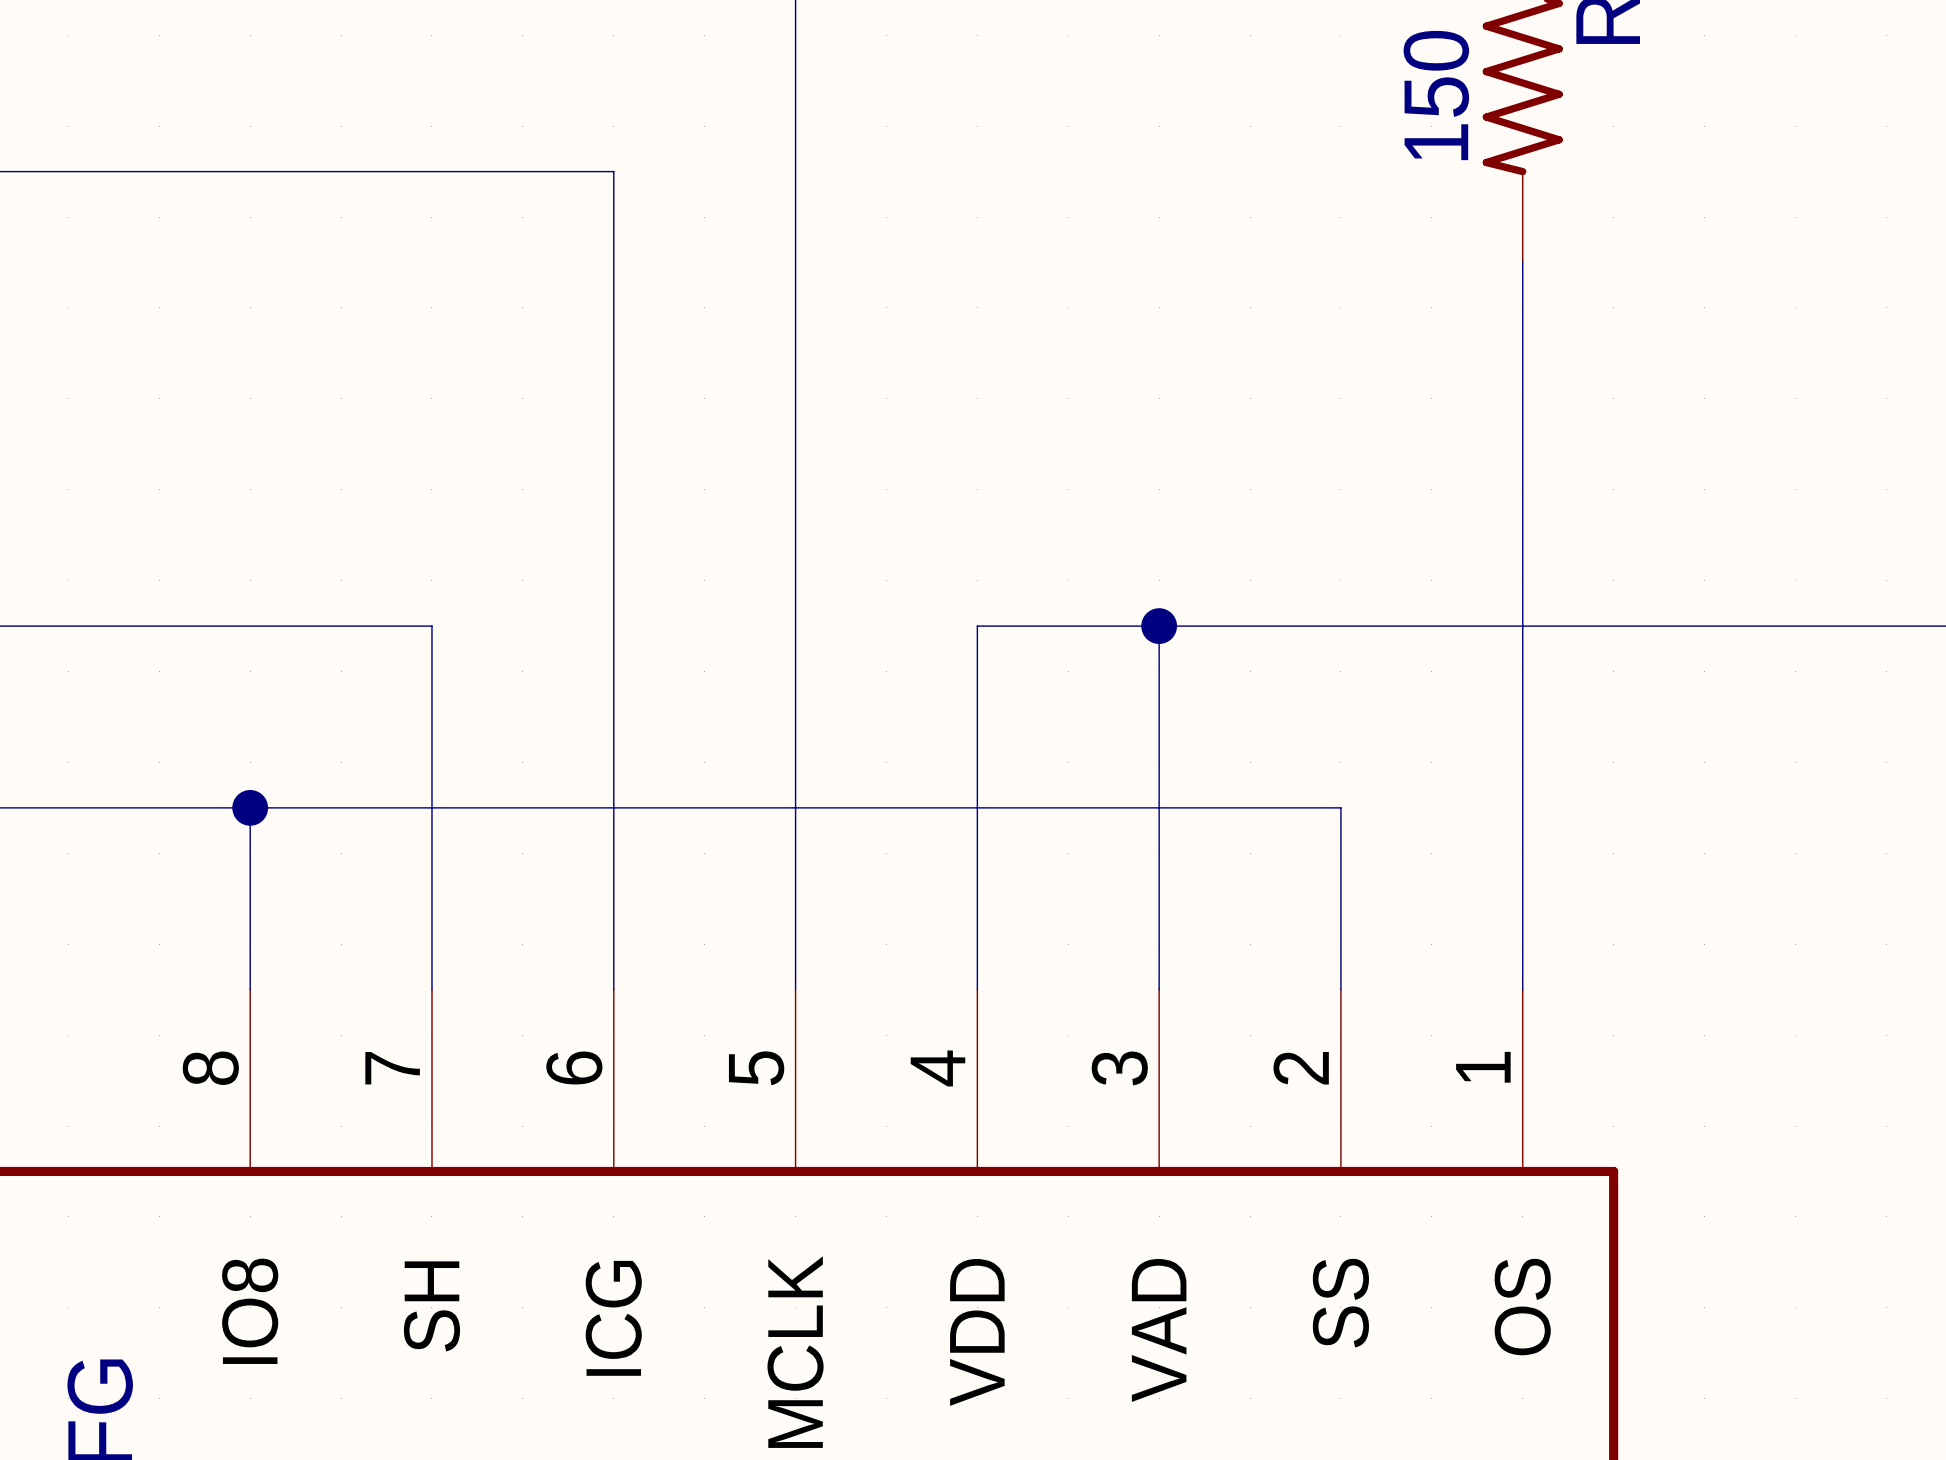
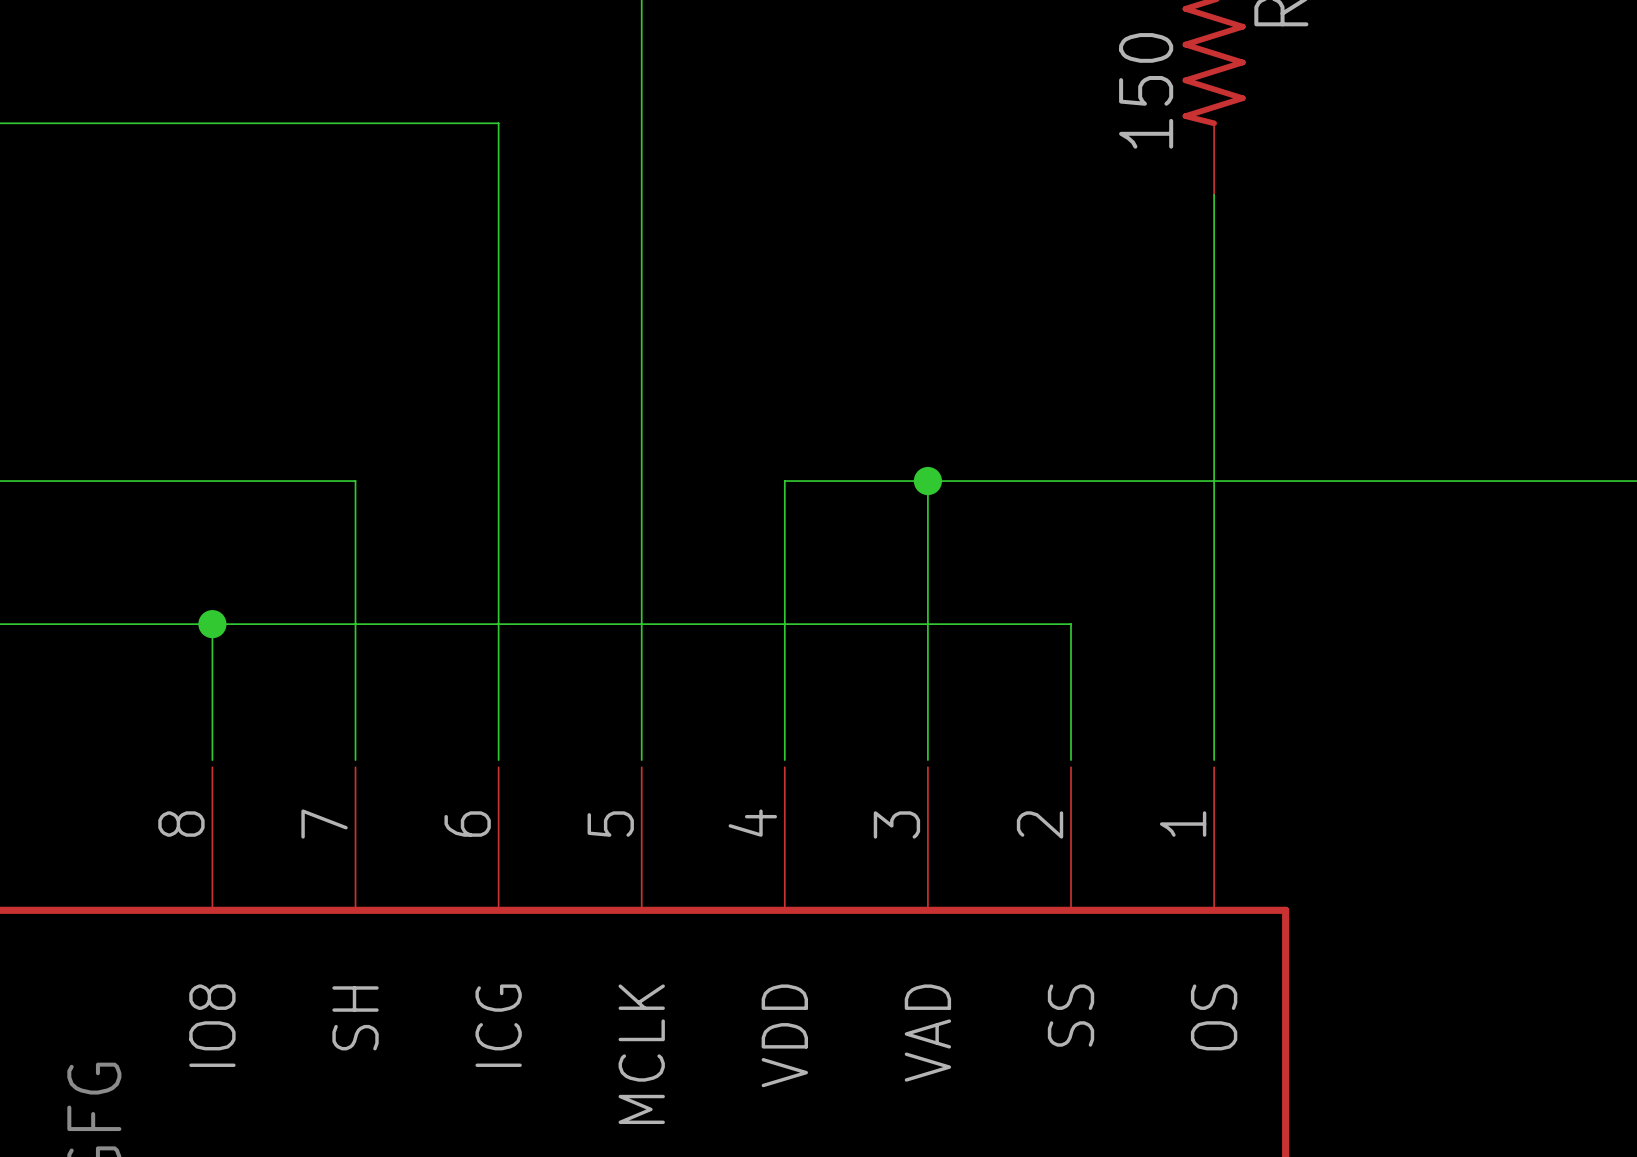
wire: (250, 980) (250, 989) -> none
wire: (431, 980) (431, 989) -> none
wire: (613, 980) (613, 989) -> none
wire: (795, 980) (795, 989) -> none
wire: (977, 980) (977, 989) -> none
wire: (1159, 980) (1159, 989) -> none
wire: (1340, 980) (1340, 989) -> none
wire: (1522, 980) (1522, 989) -> none

